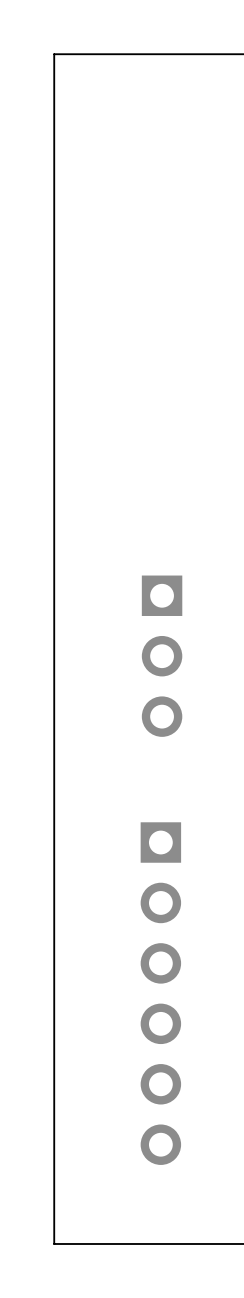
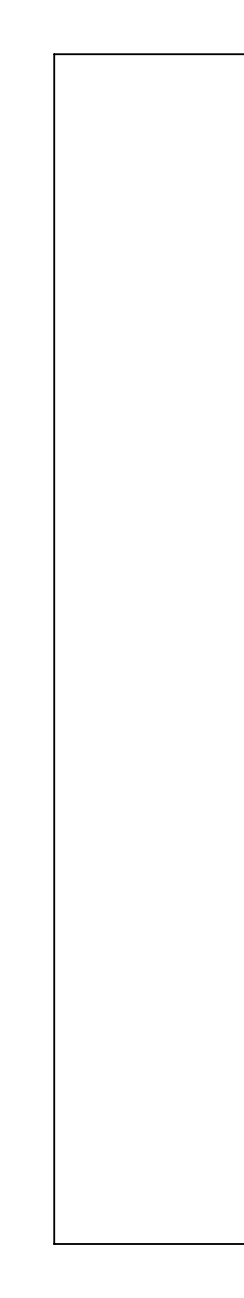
part: (162, 656) -> none
part: (160, 993) -> none

